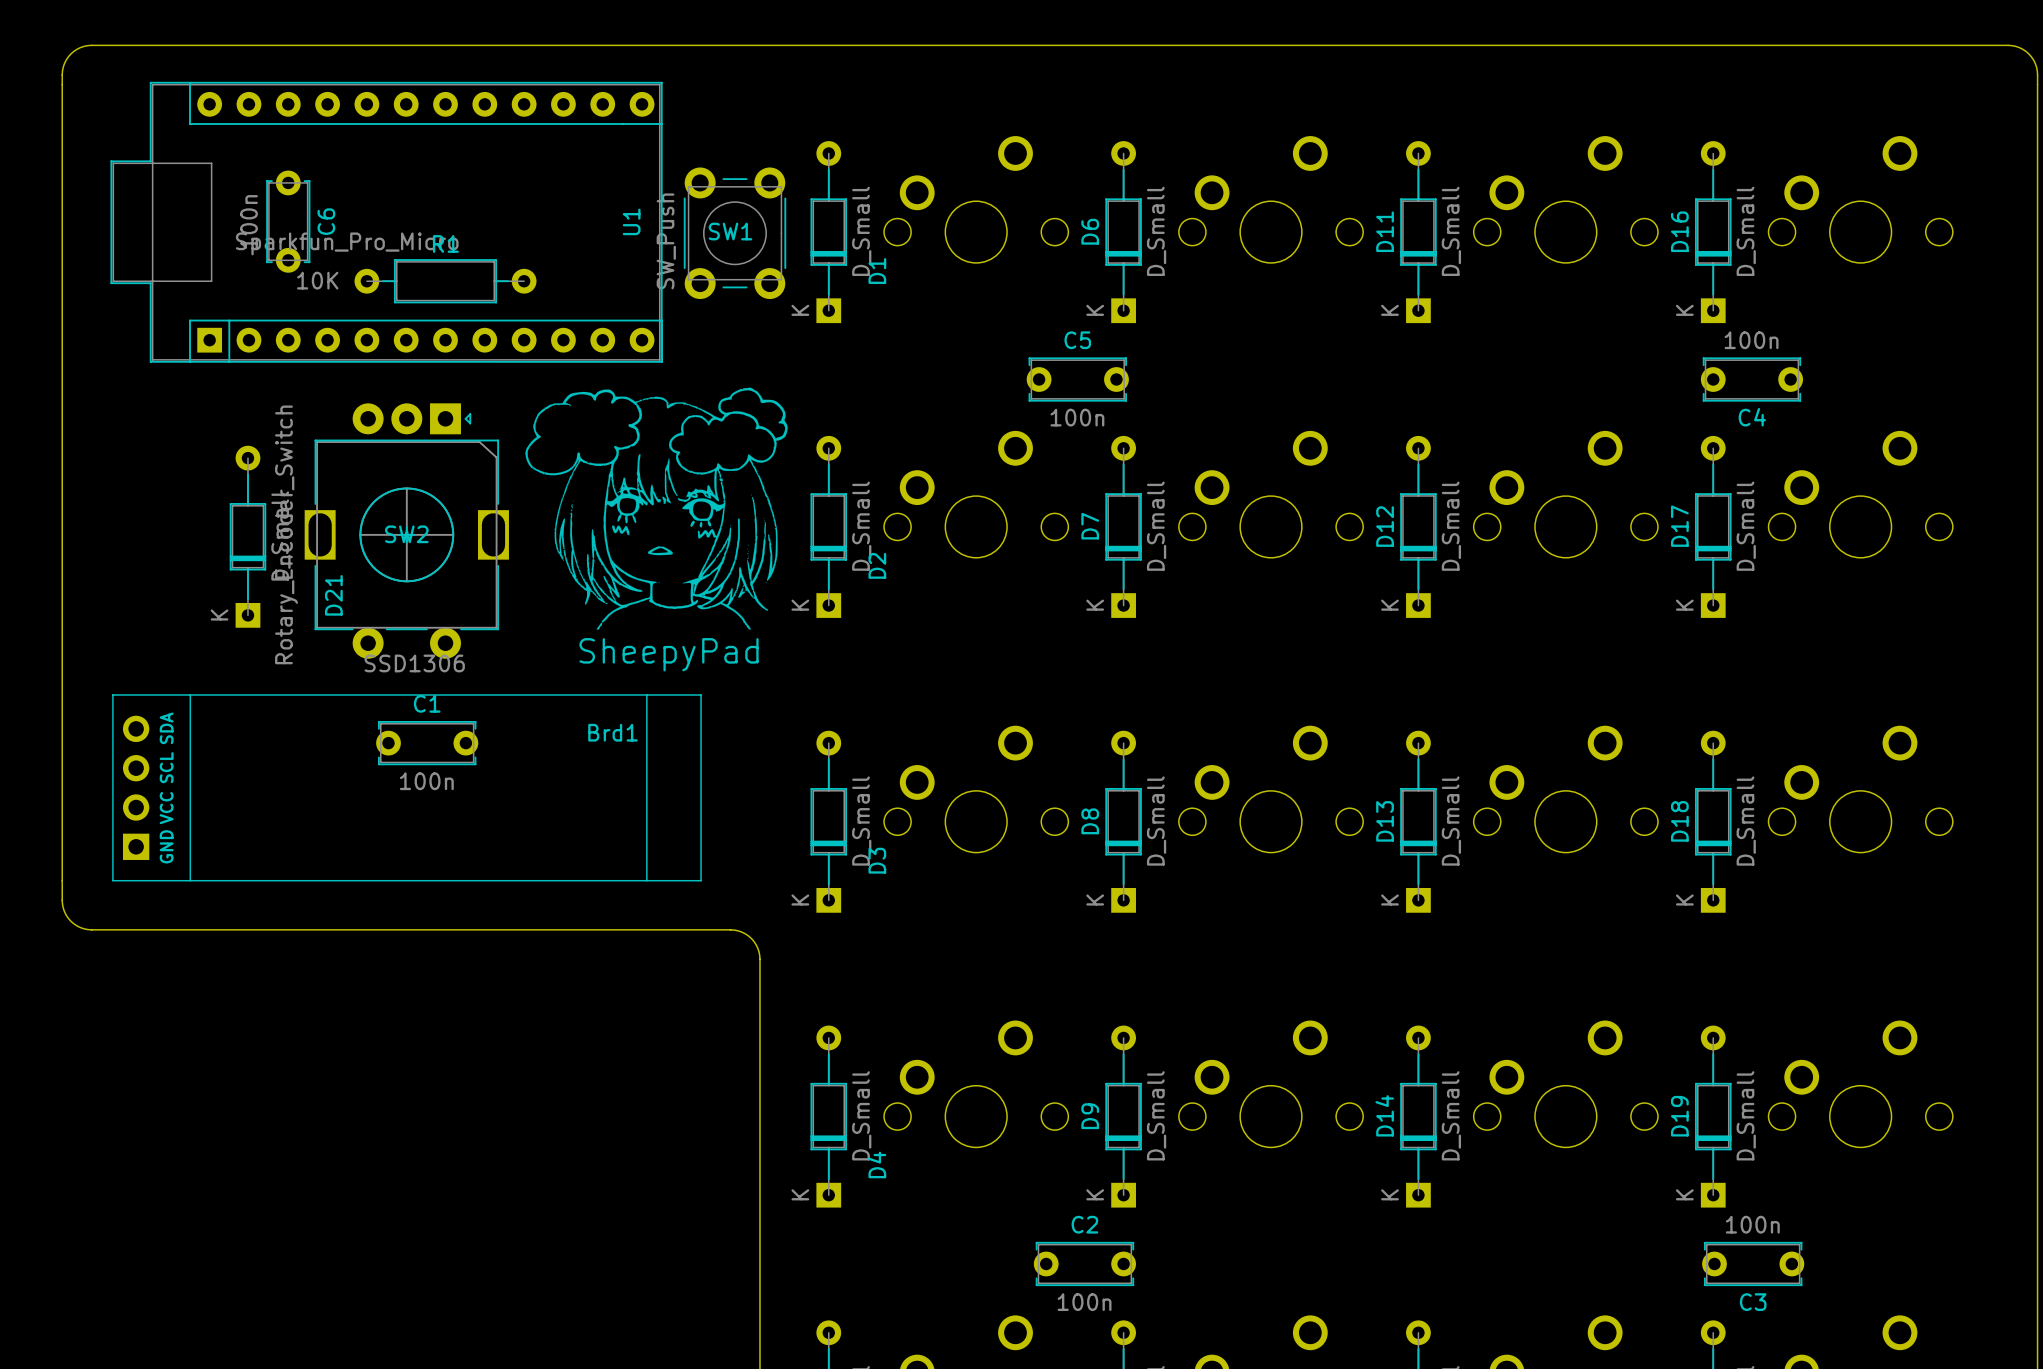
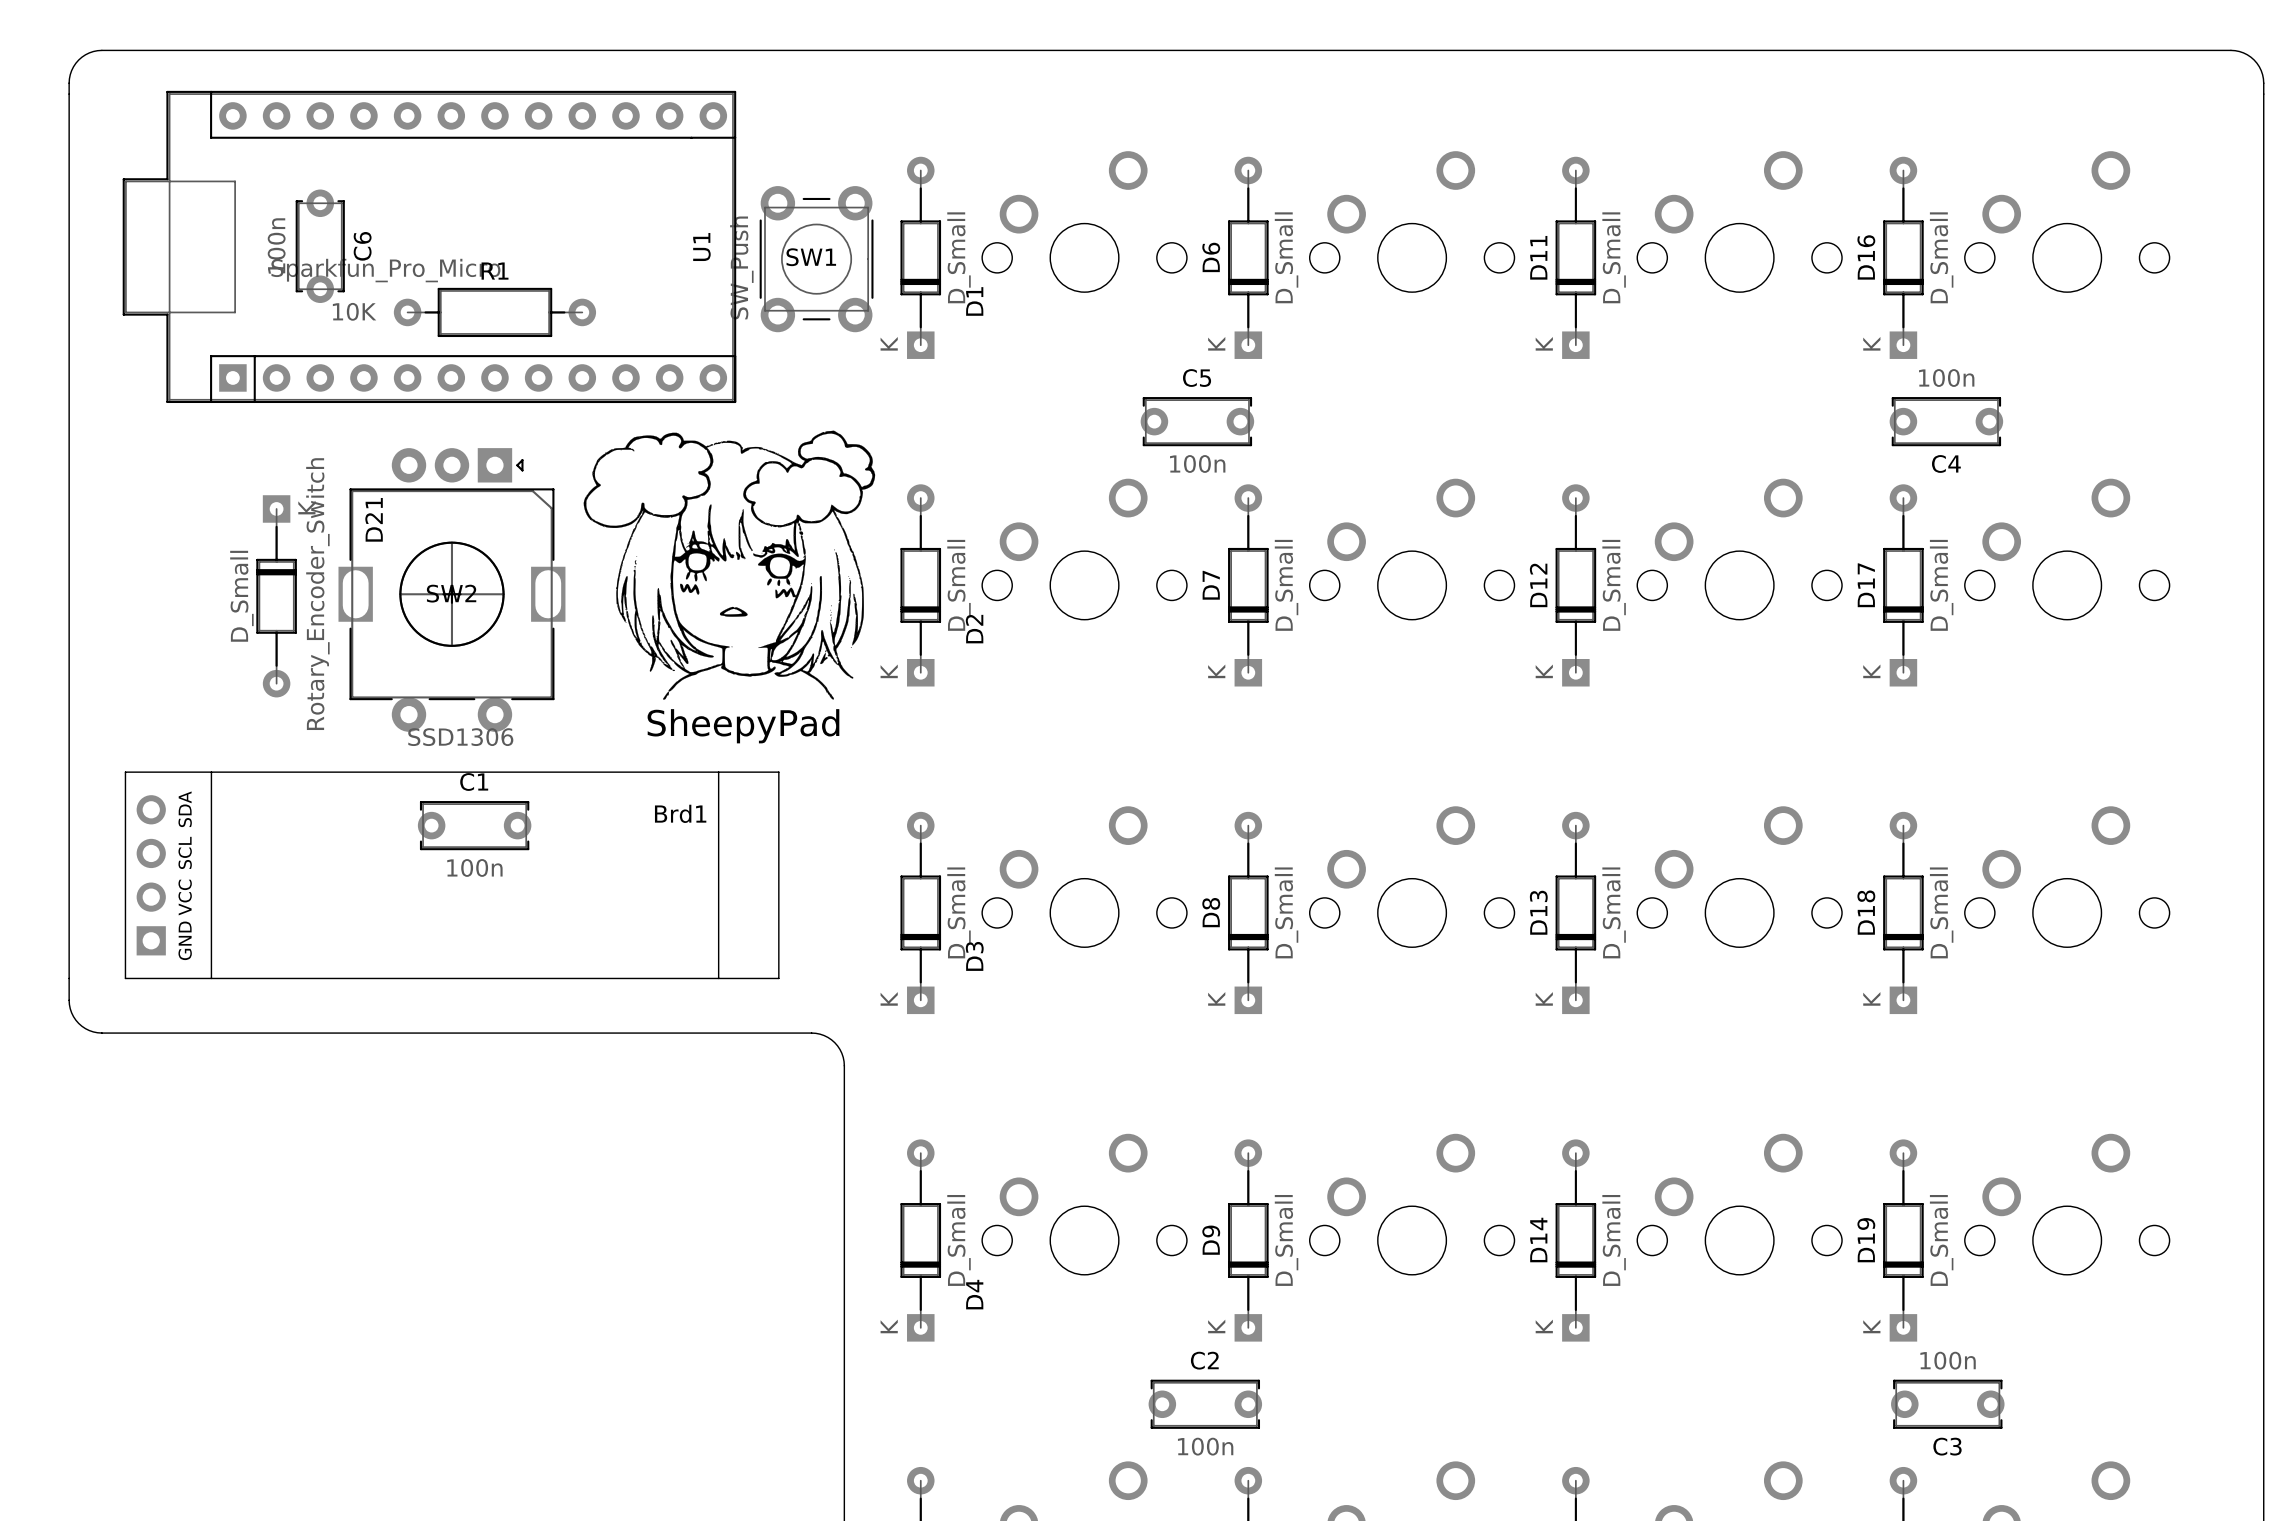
D21 rotation: 0° (247, 536) -> 180° (276, 596)
D21 name position: D21 (333, 595) -> D21 (374, 519)

